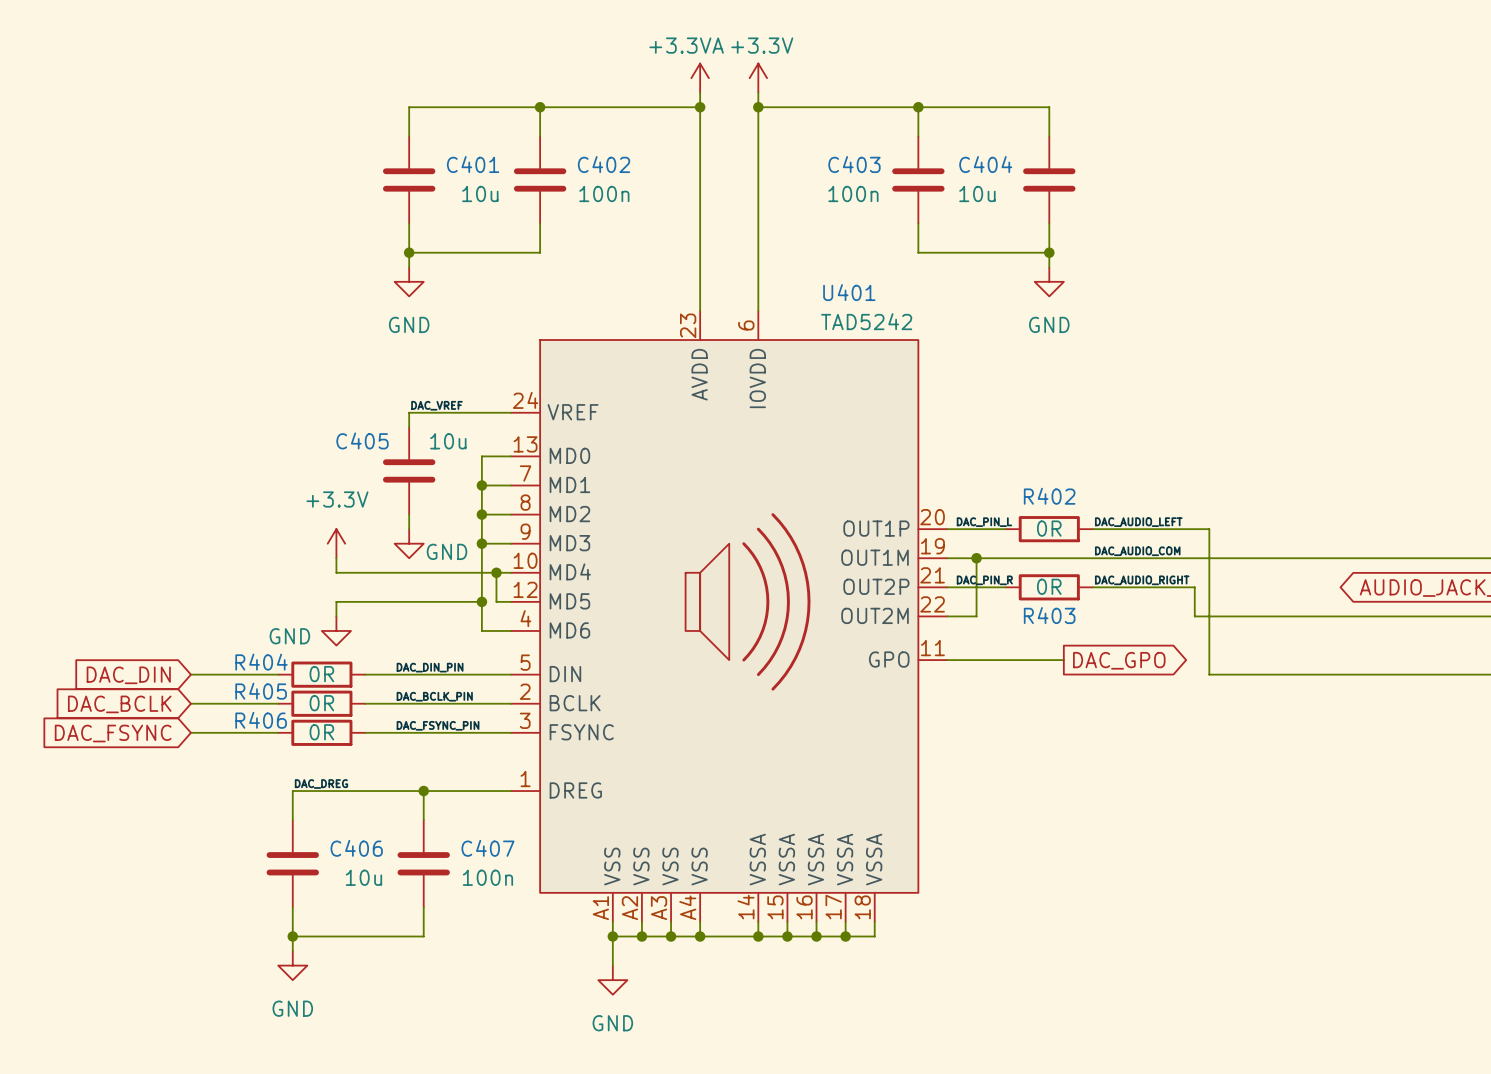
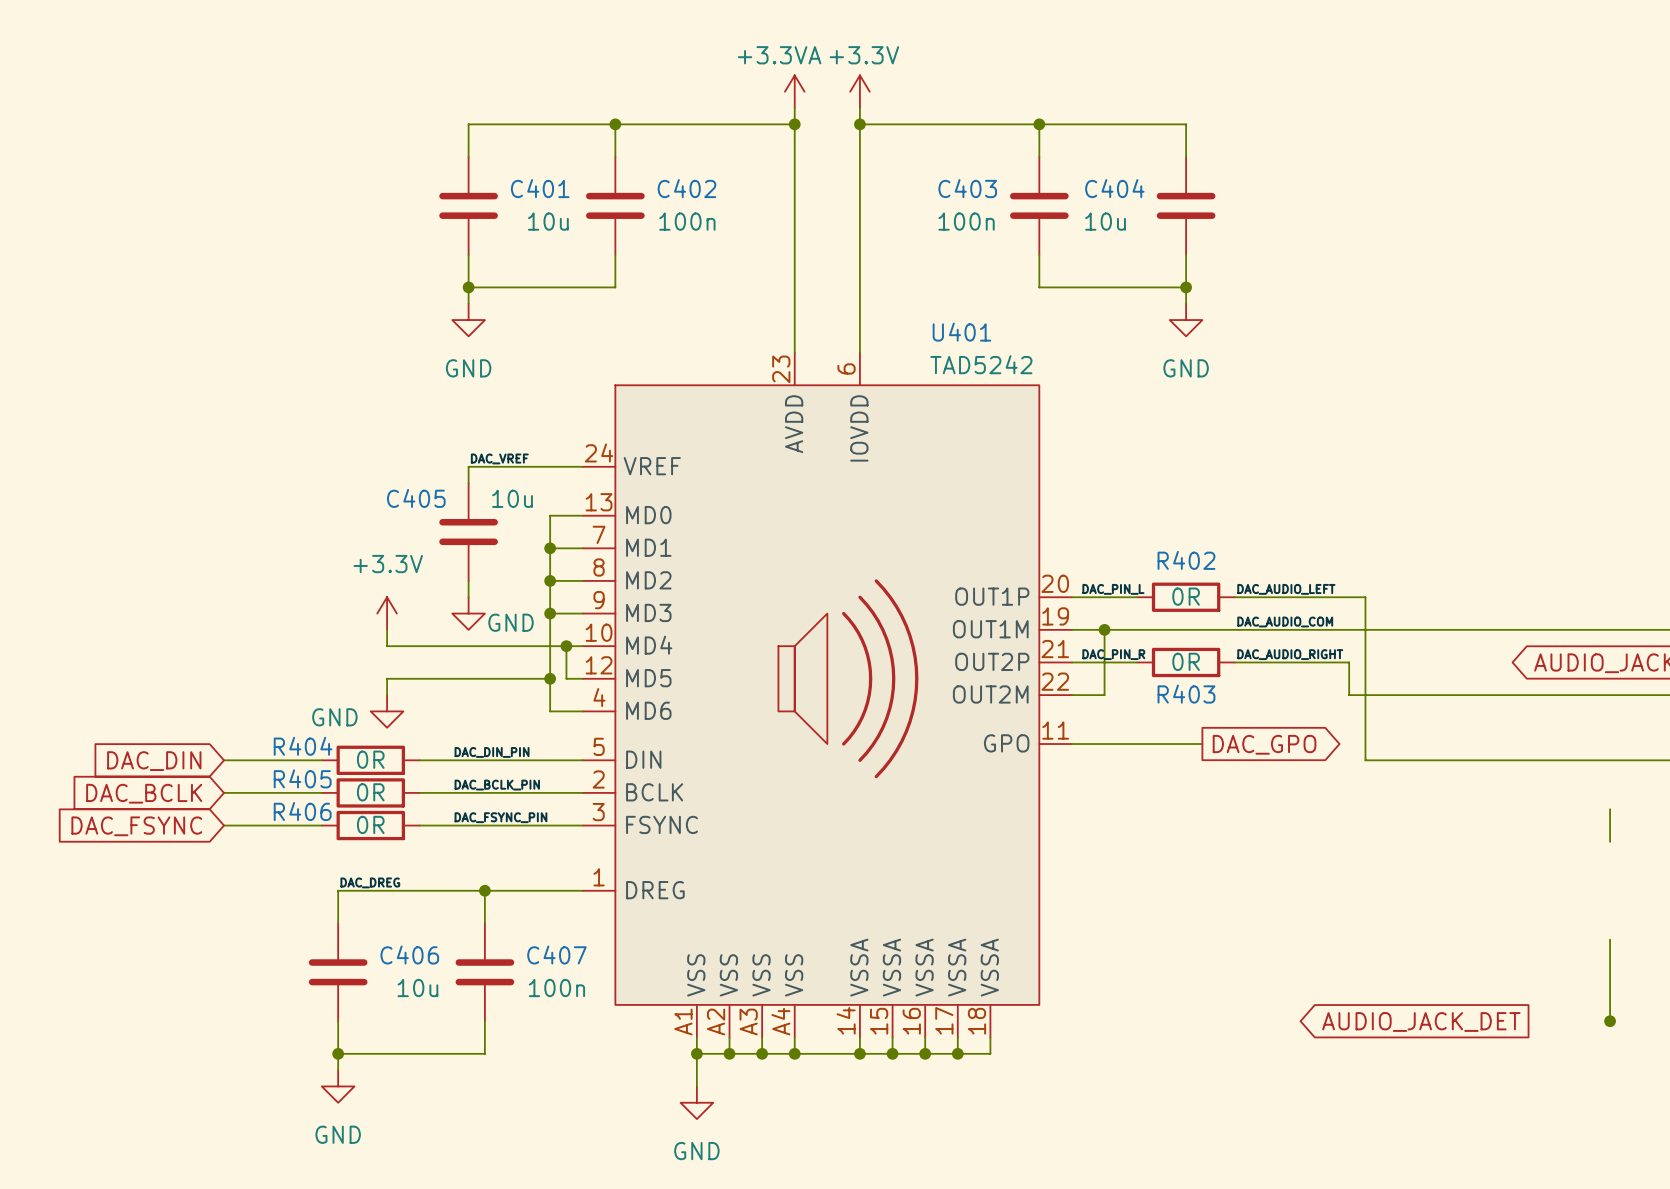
wire: none -> (1610, 809) (1610, 841)
wire: none -> (1610, 939) (1610, 1021)
junction: none -> (1610, 1021)
global label: none -> AUDIO_JACK_DET (1421, 1022)

